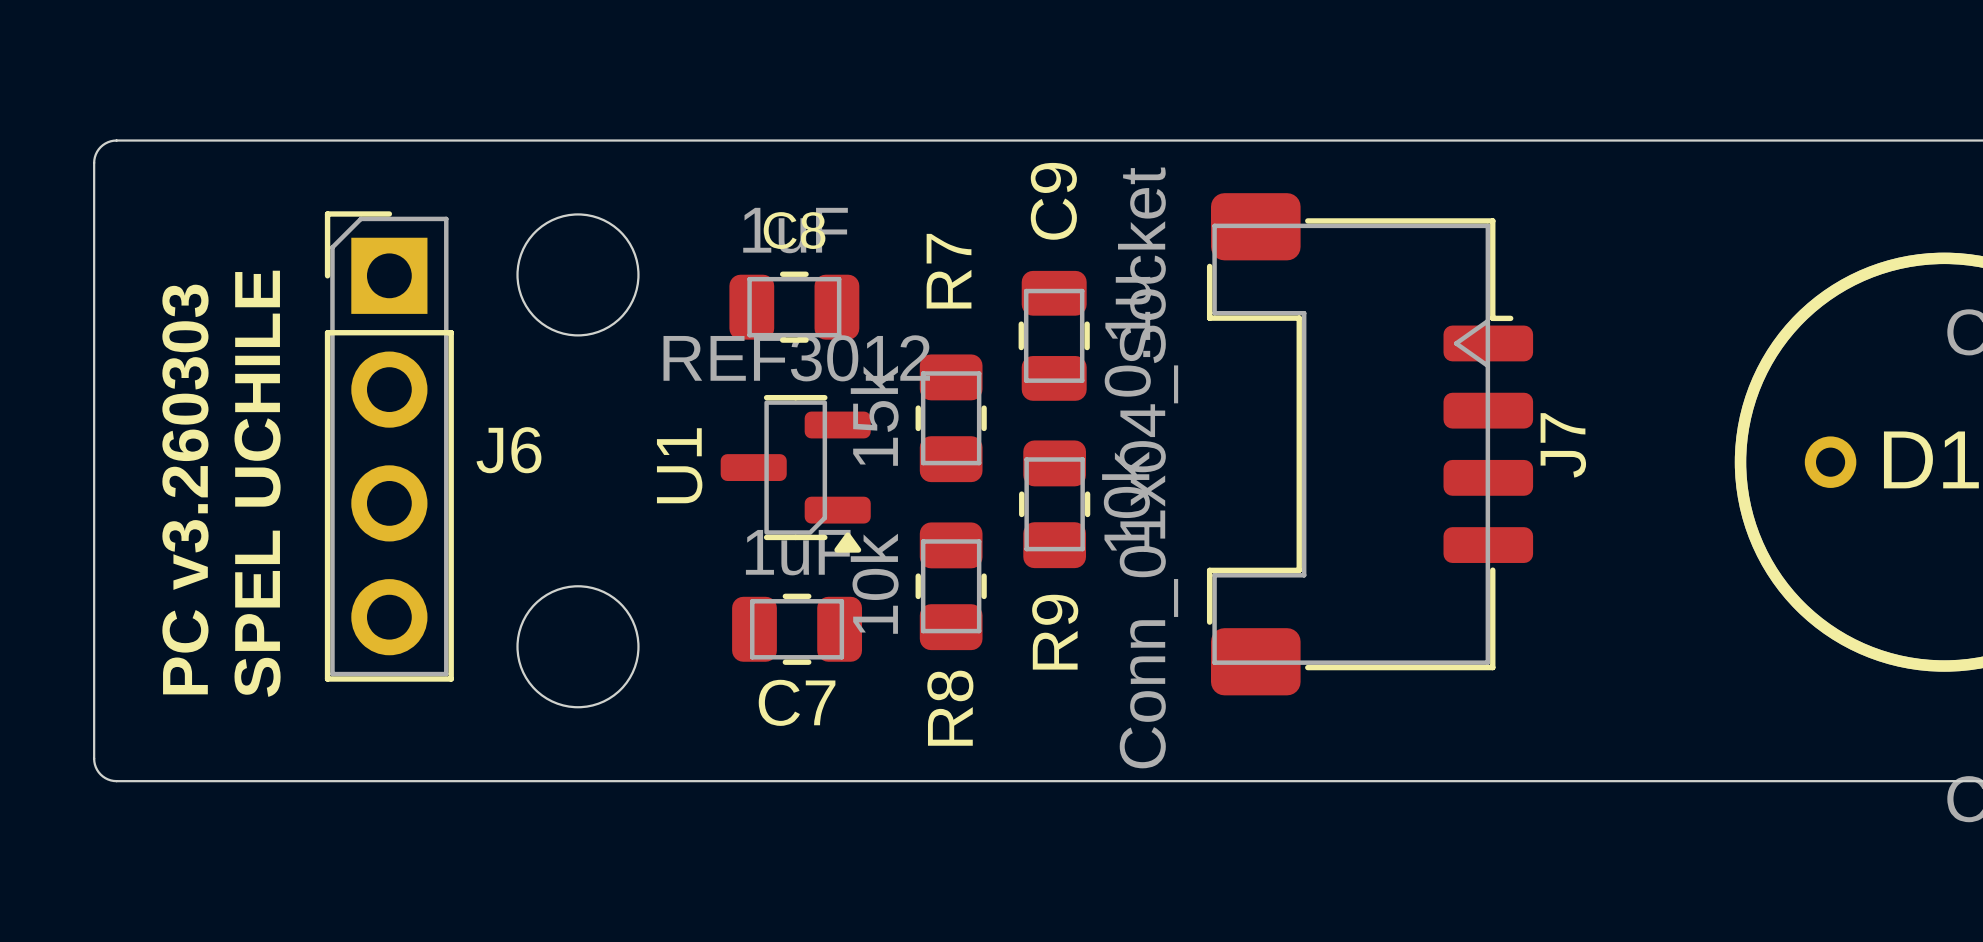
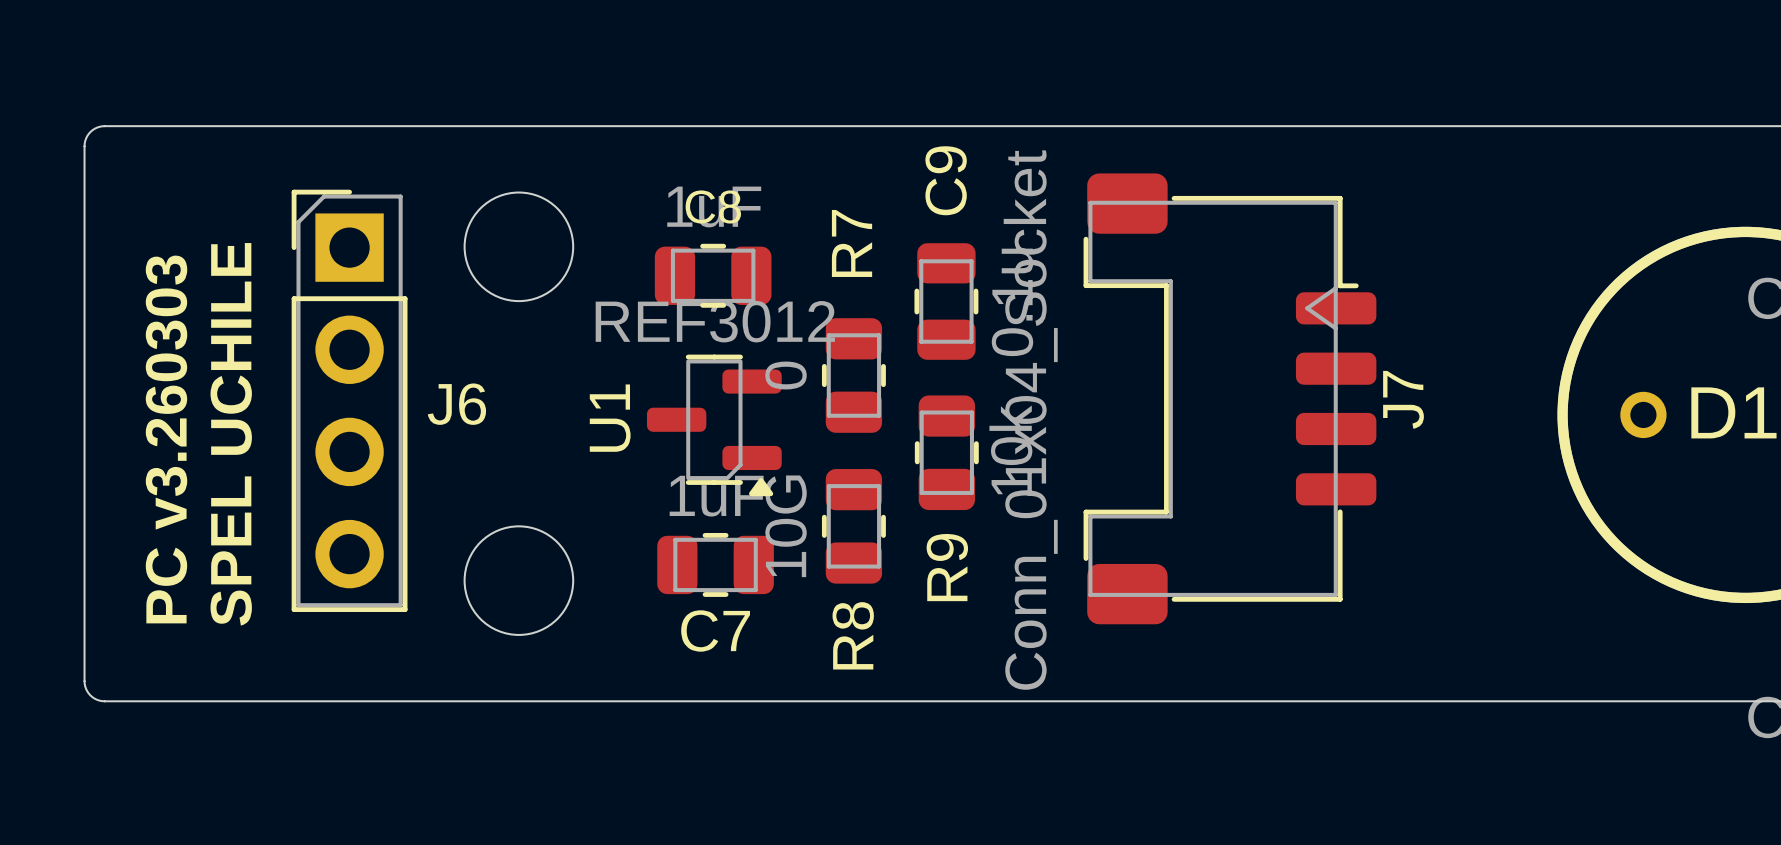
R7 value: 15k (874, 415) -> 0 (786, 375)
R8 value: 10k (874, 583) -> 10G (786, 526)

